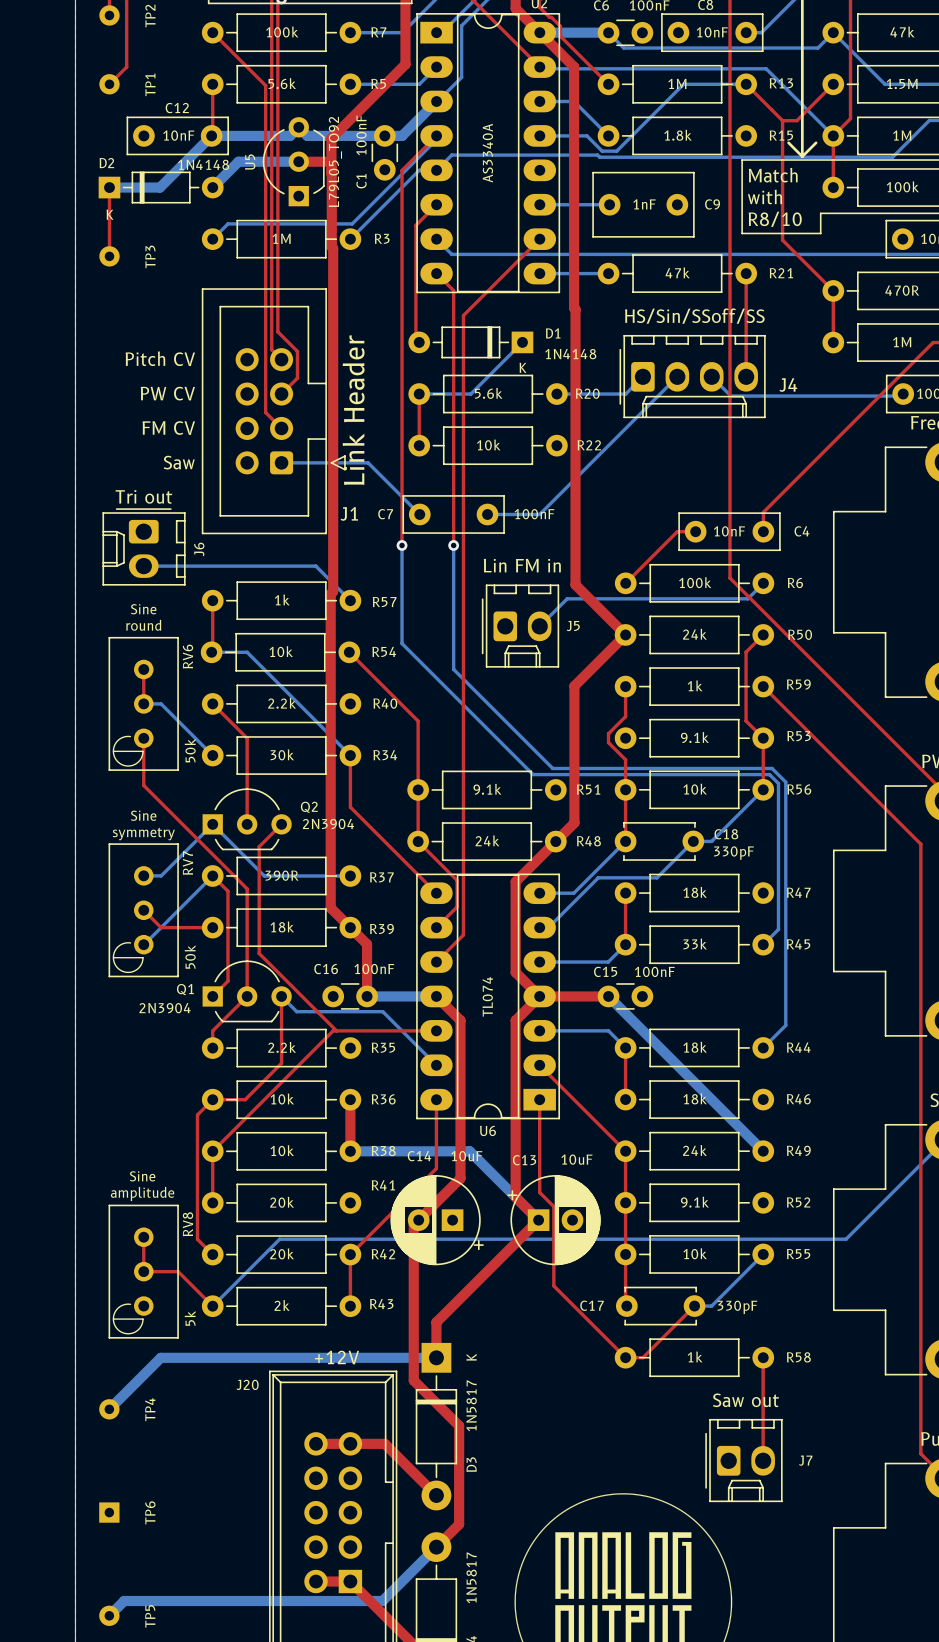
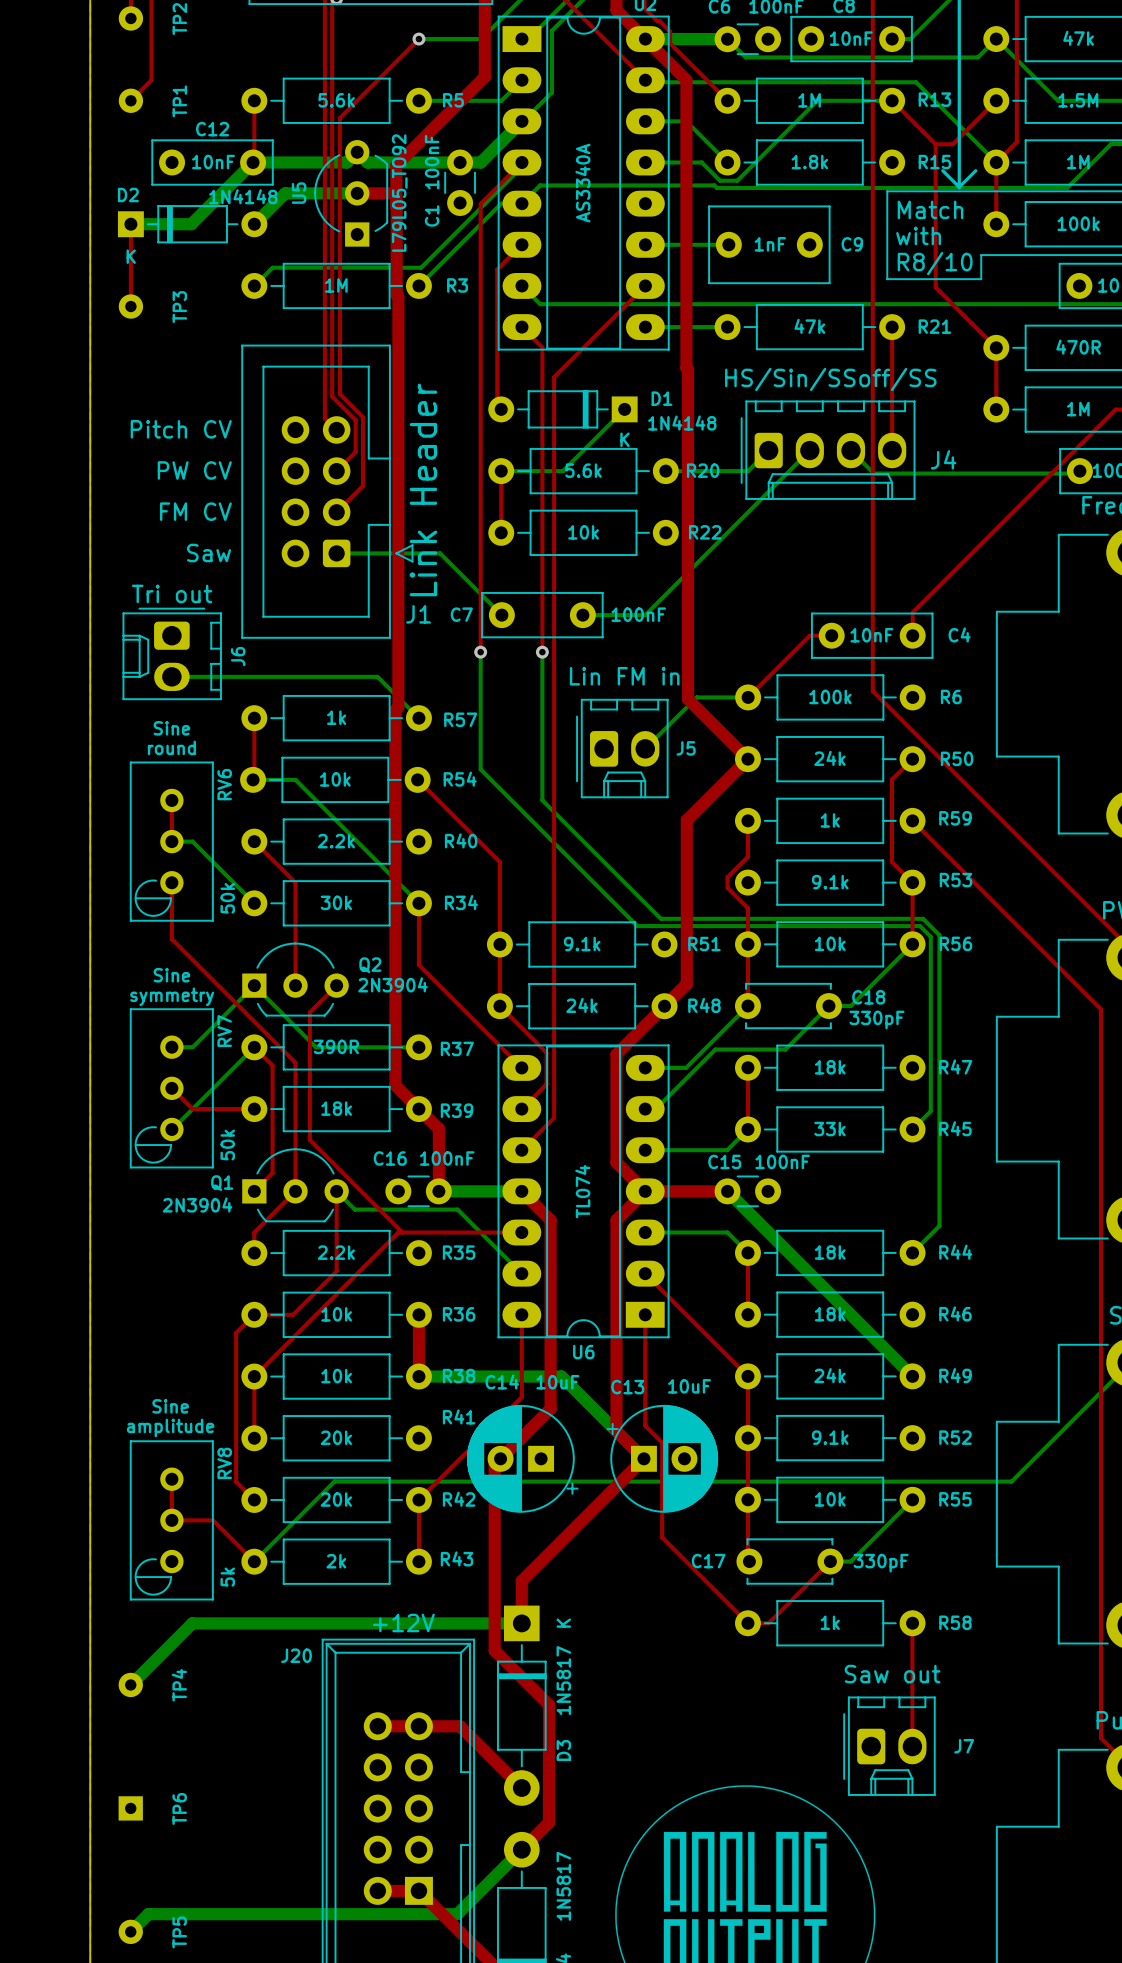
top track: (212, 32) (265, 85) (265, 412) (281, 428) -> (340, 251) (340, 394) (362, 417) (362, 485) (336, 512)
R7: 100k (281, 32) -> none
top track: none -> (418, 39) (339, 118) (339, 251)
via: none -> (418, 39)
bottom track: (763, 583) (747, 598) (567, 598) -> (748, 697) (696, 697) (678, 715)

